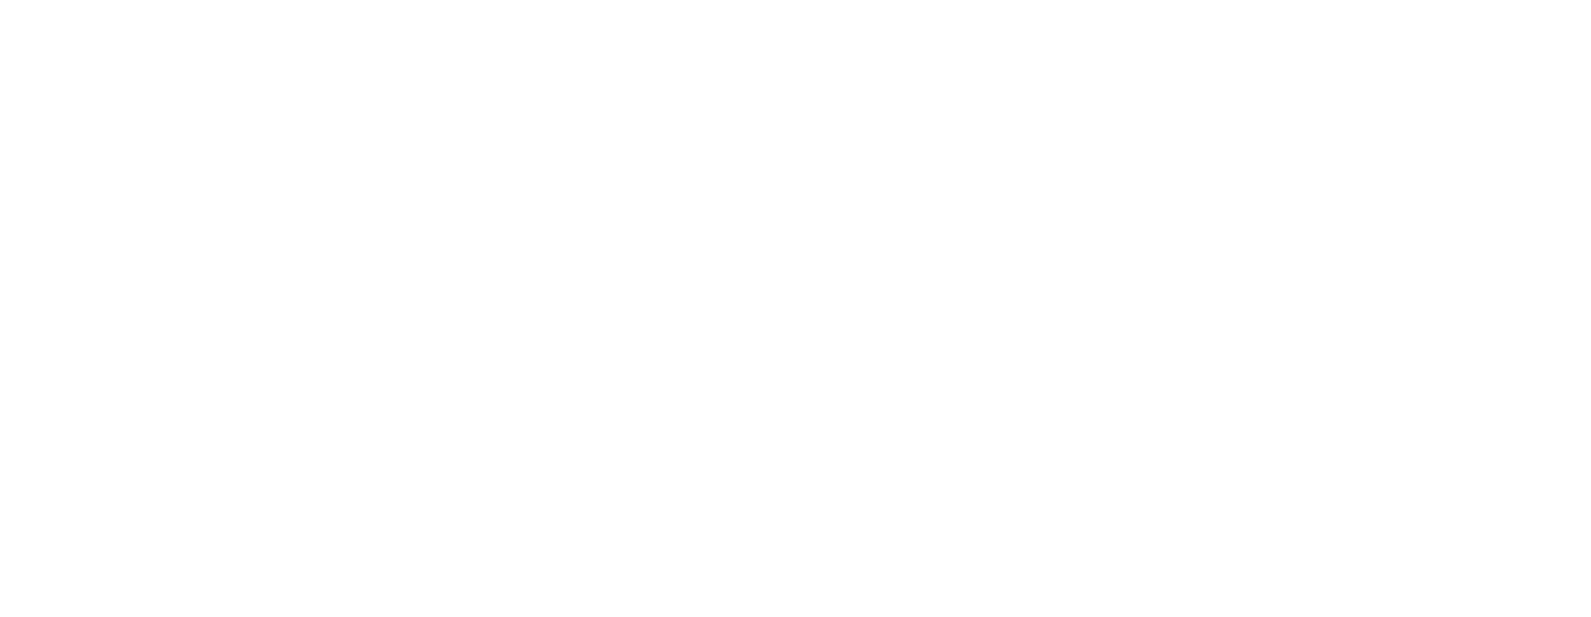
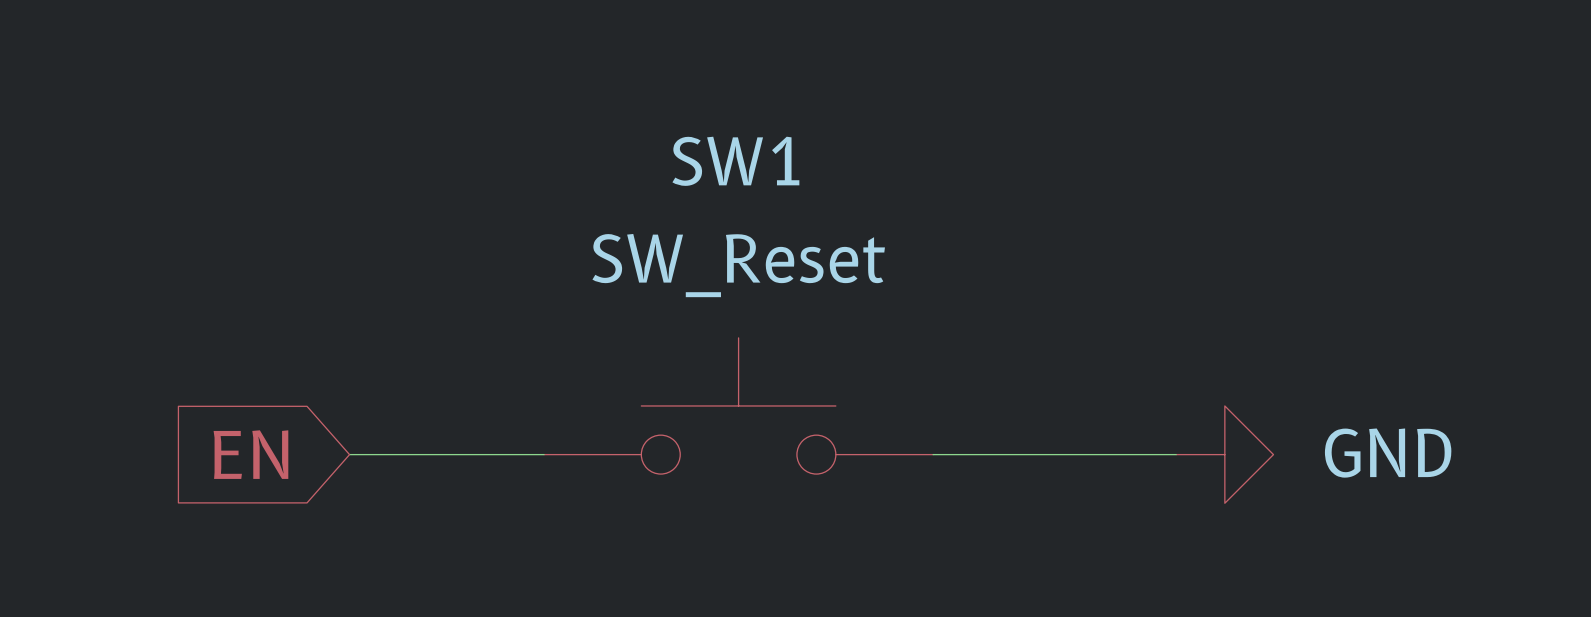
SW1: none -> SW_Reset (738, 405)
global label: none -> EN (250, 454)
wire: none -> (349, 454) (544, 454)
wire: none -> (933, 454) (1176, 454)
power symbol: none -> GND (1224, 454)

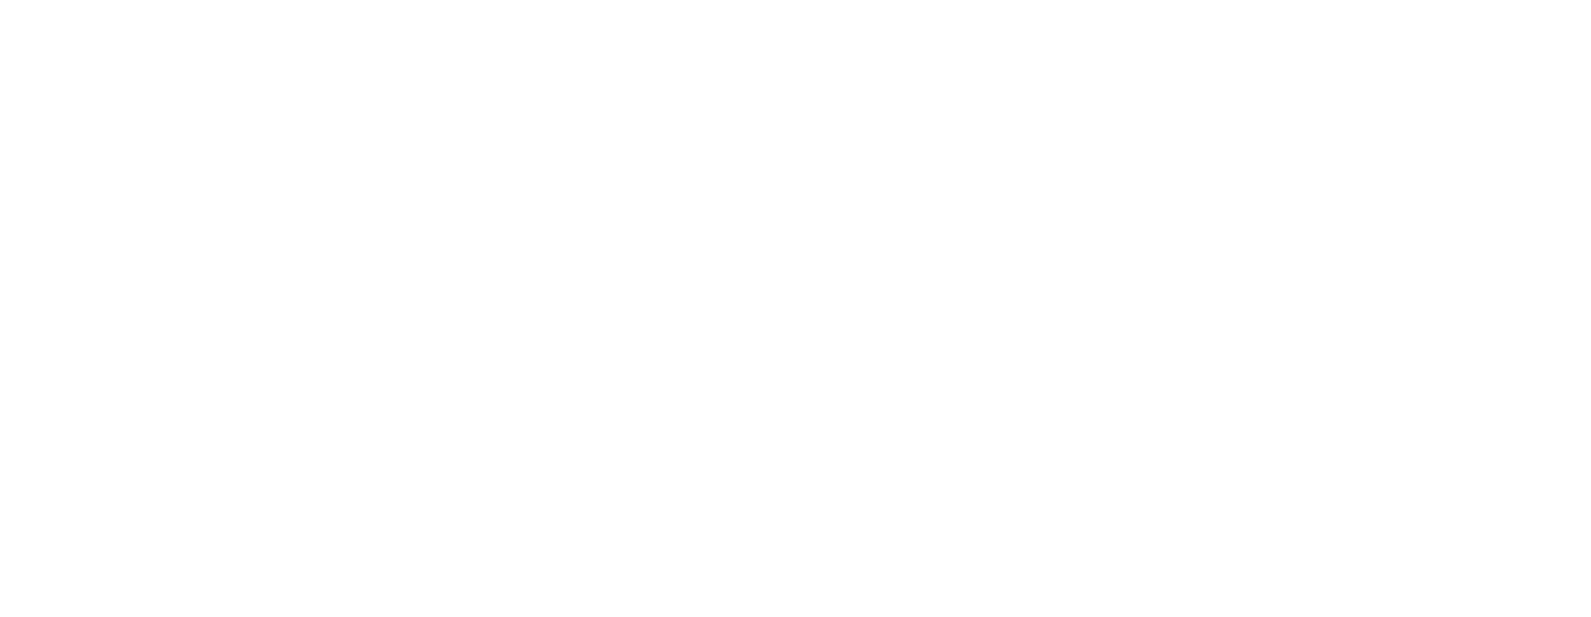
SW1: SW_Reset (738, 405) -> none
global label: EN (250, 454) -> none
wire: (349, 454) (544, 454) -> none
wire: (933, 454) (1176, 454) -> none
power symbol: GND (1224, 454) -> none

